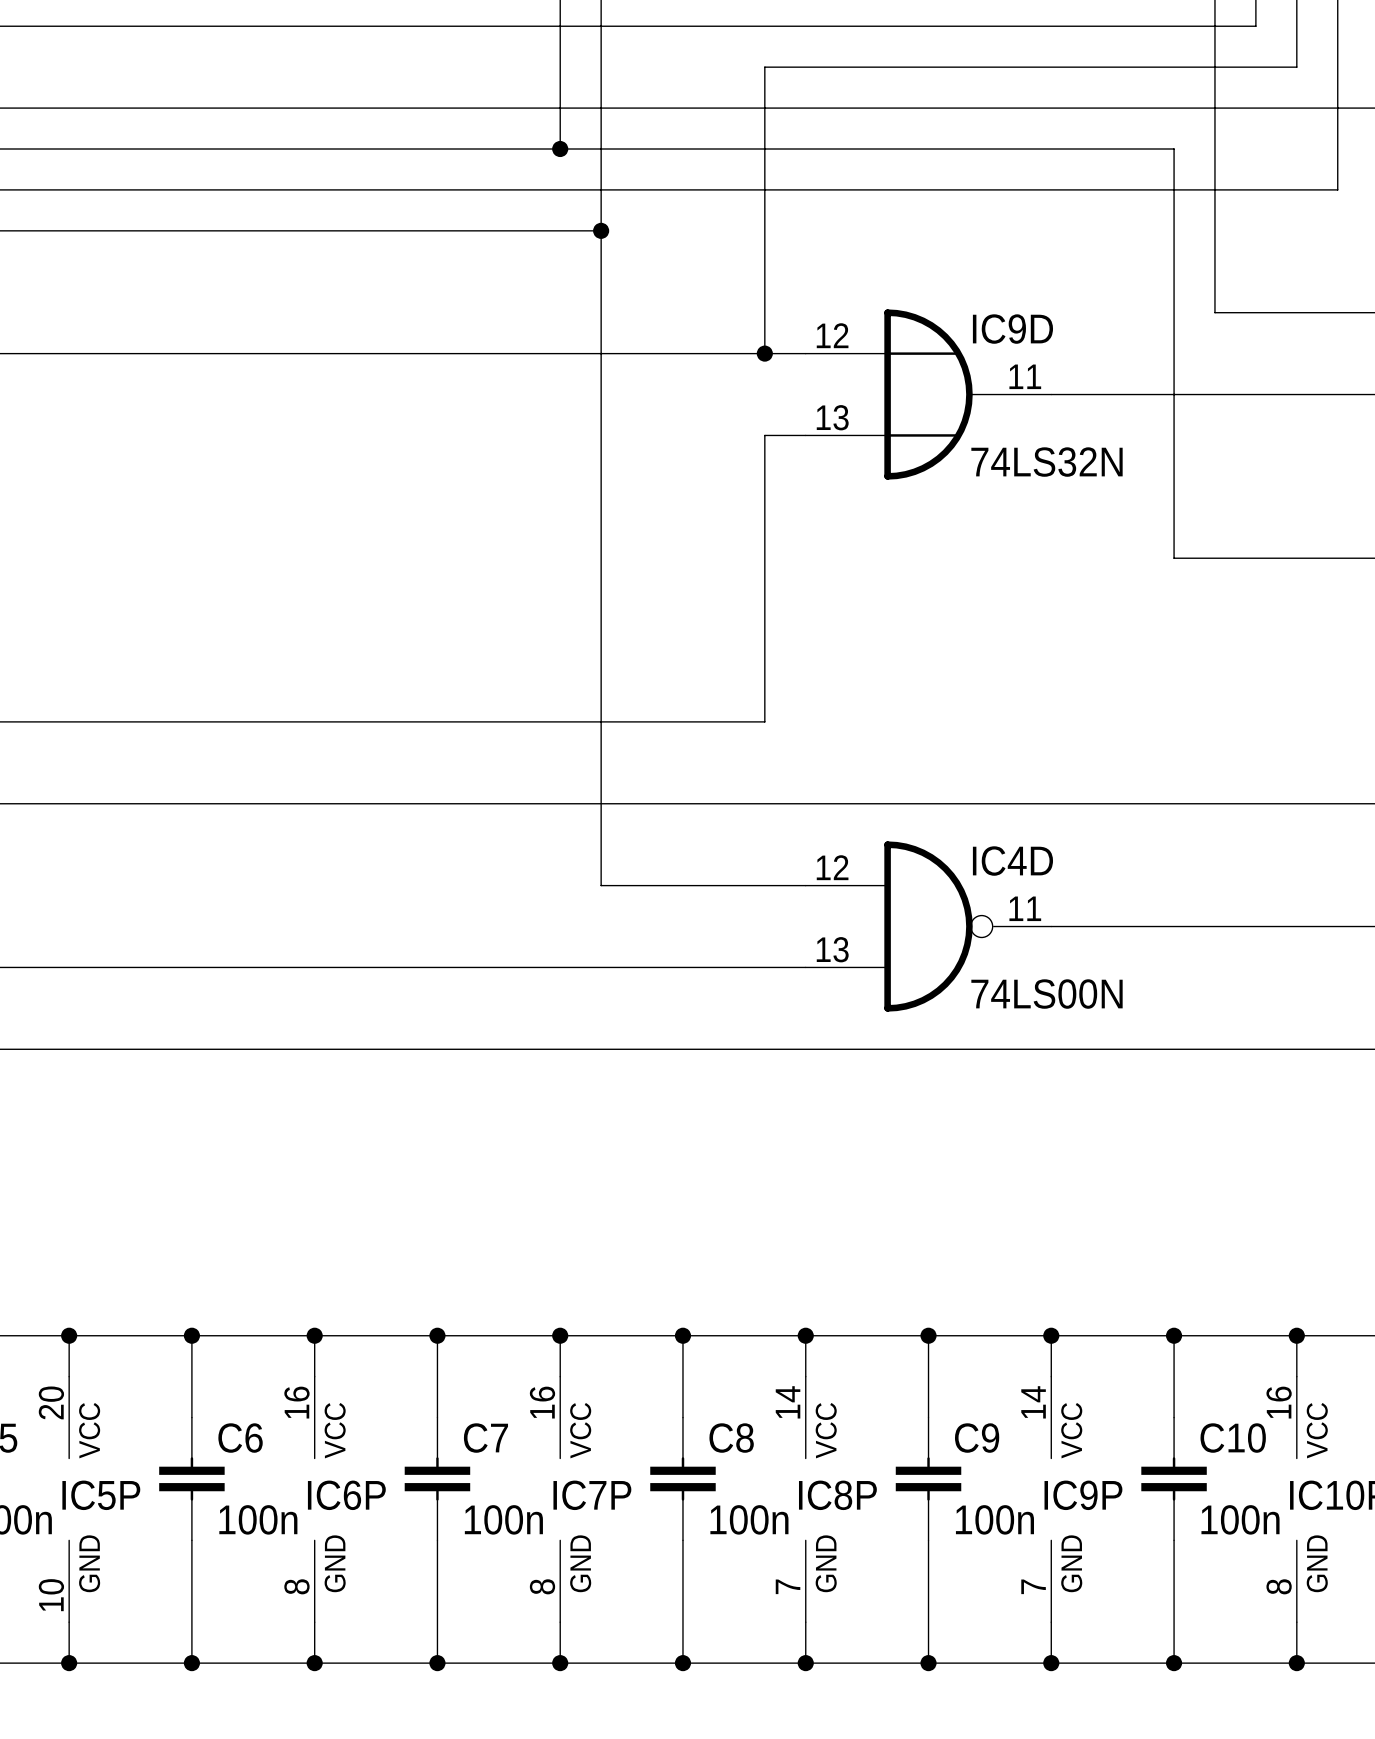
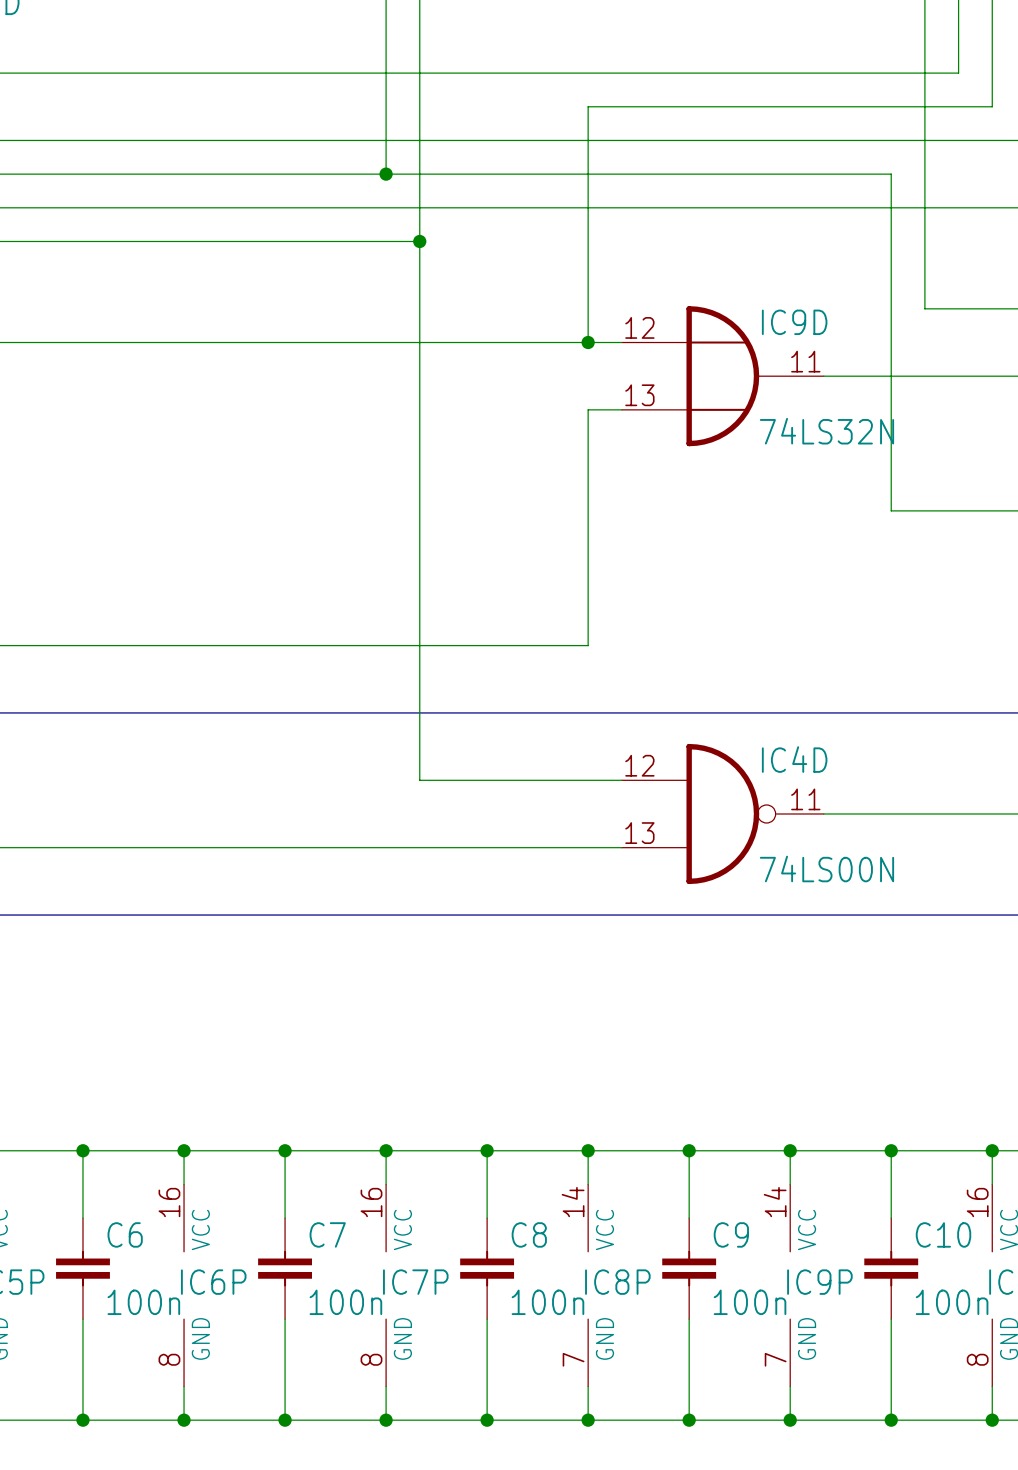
wire: (805, 67) (764, 67) (764, 353) -> (588, 106) (588, 342) (621, 342)
junction position: (764, 353) -> (588, 342)
IC9D position: (928, 394) -> (722, 376)
wire: (805, 435) (764, 435) (764, 721) -> (621, 409) (588, 409) (588, 645) (554, 645)
IC4D position: (928, 926) -> (722, 813)

